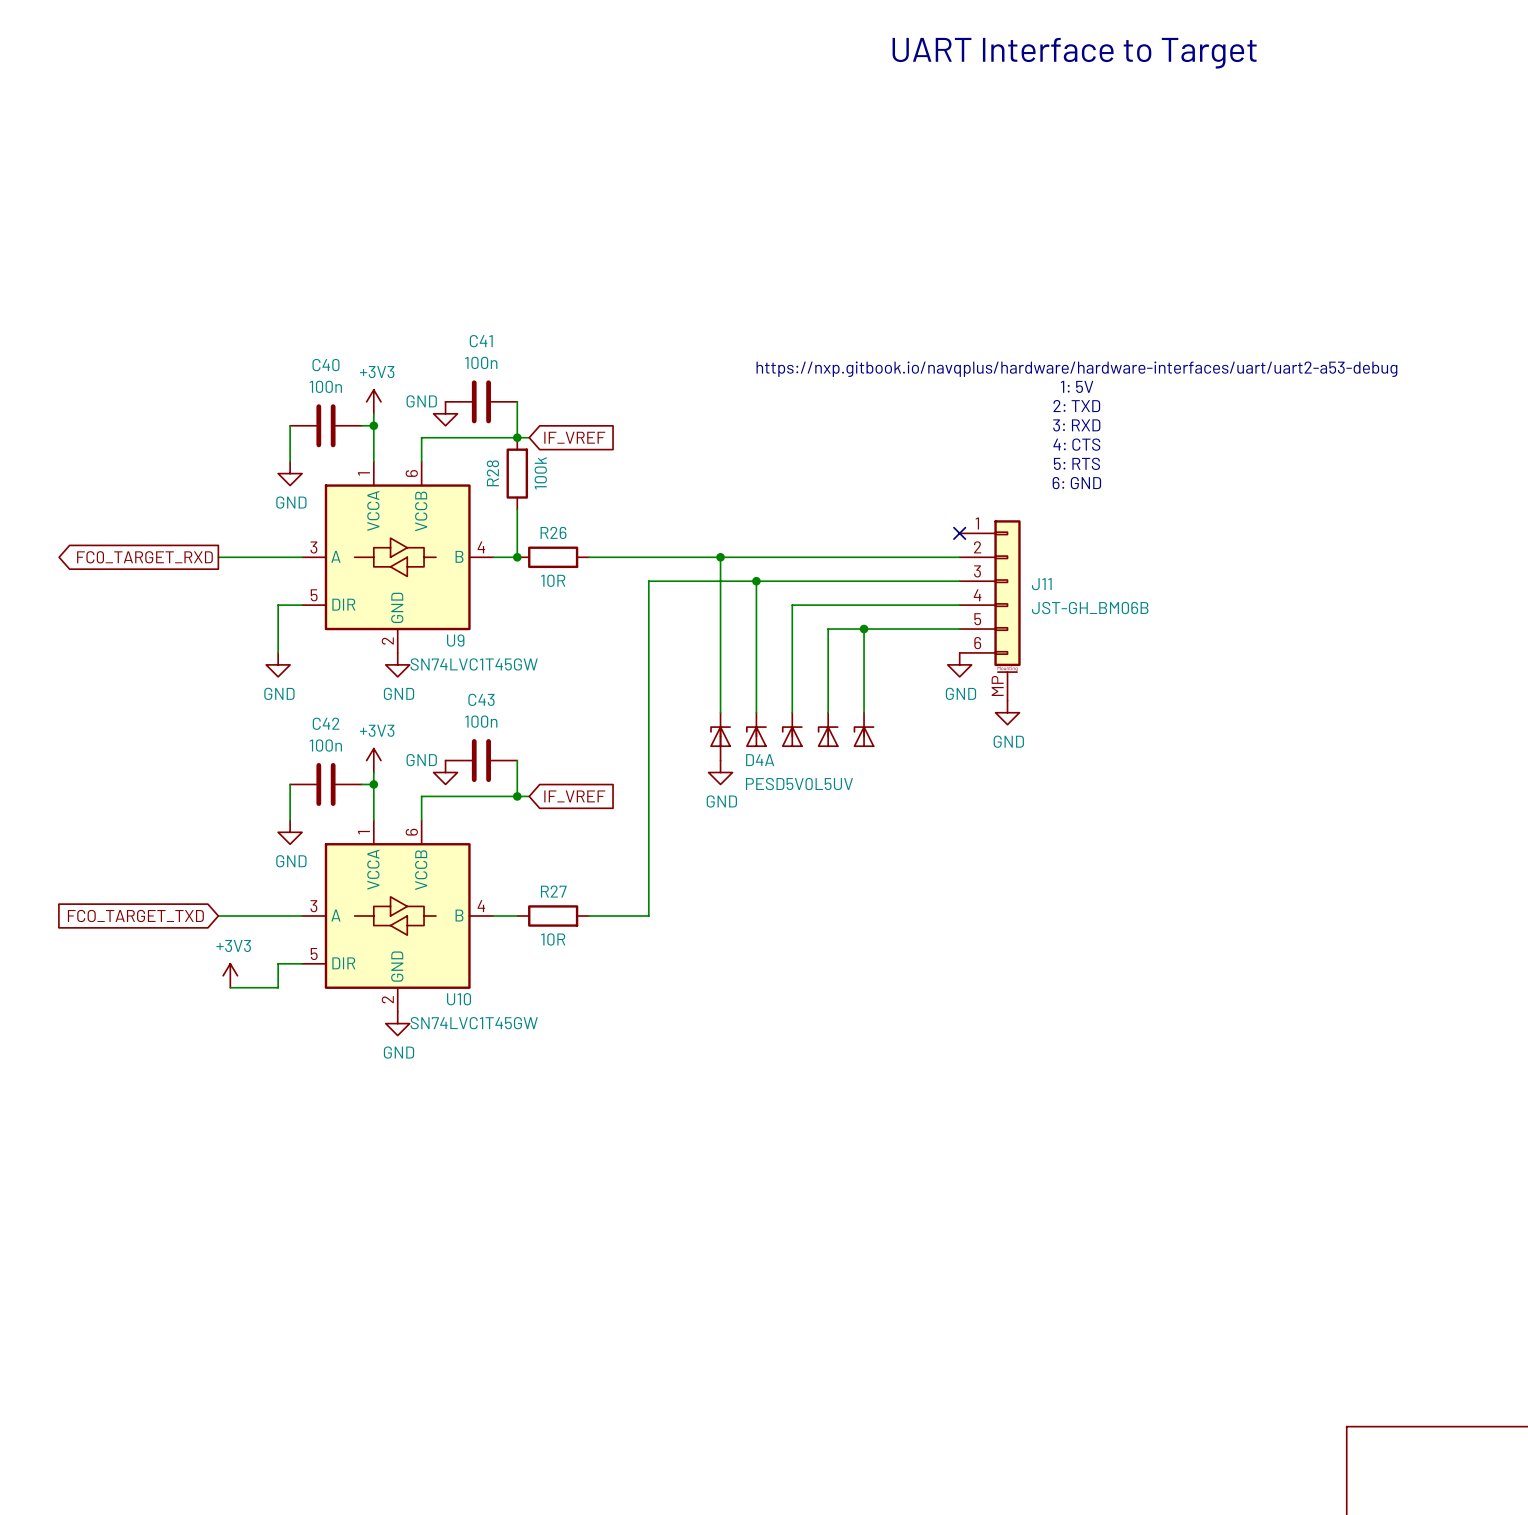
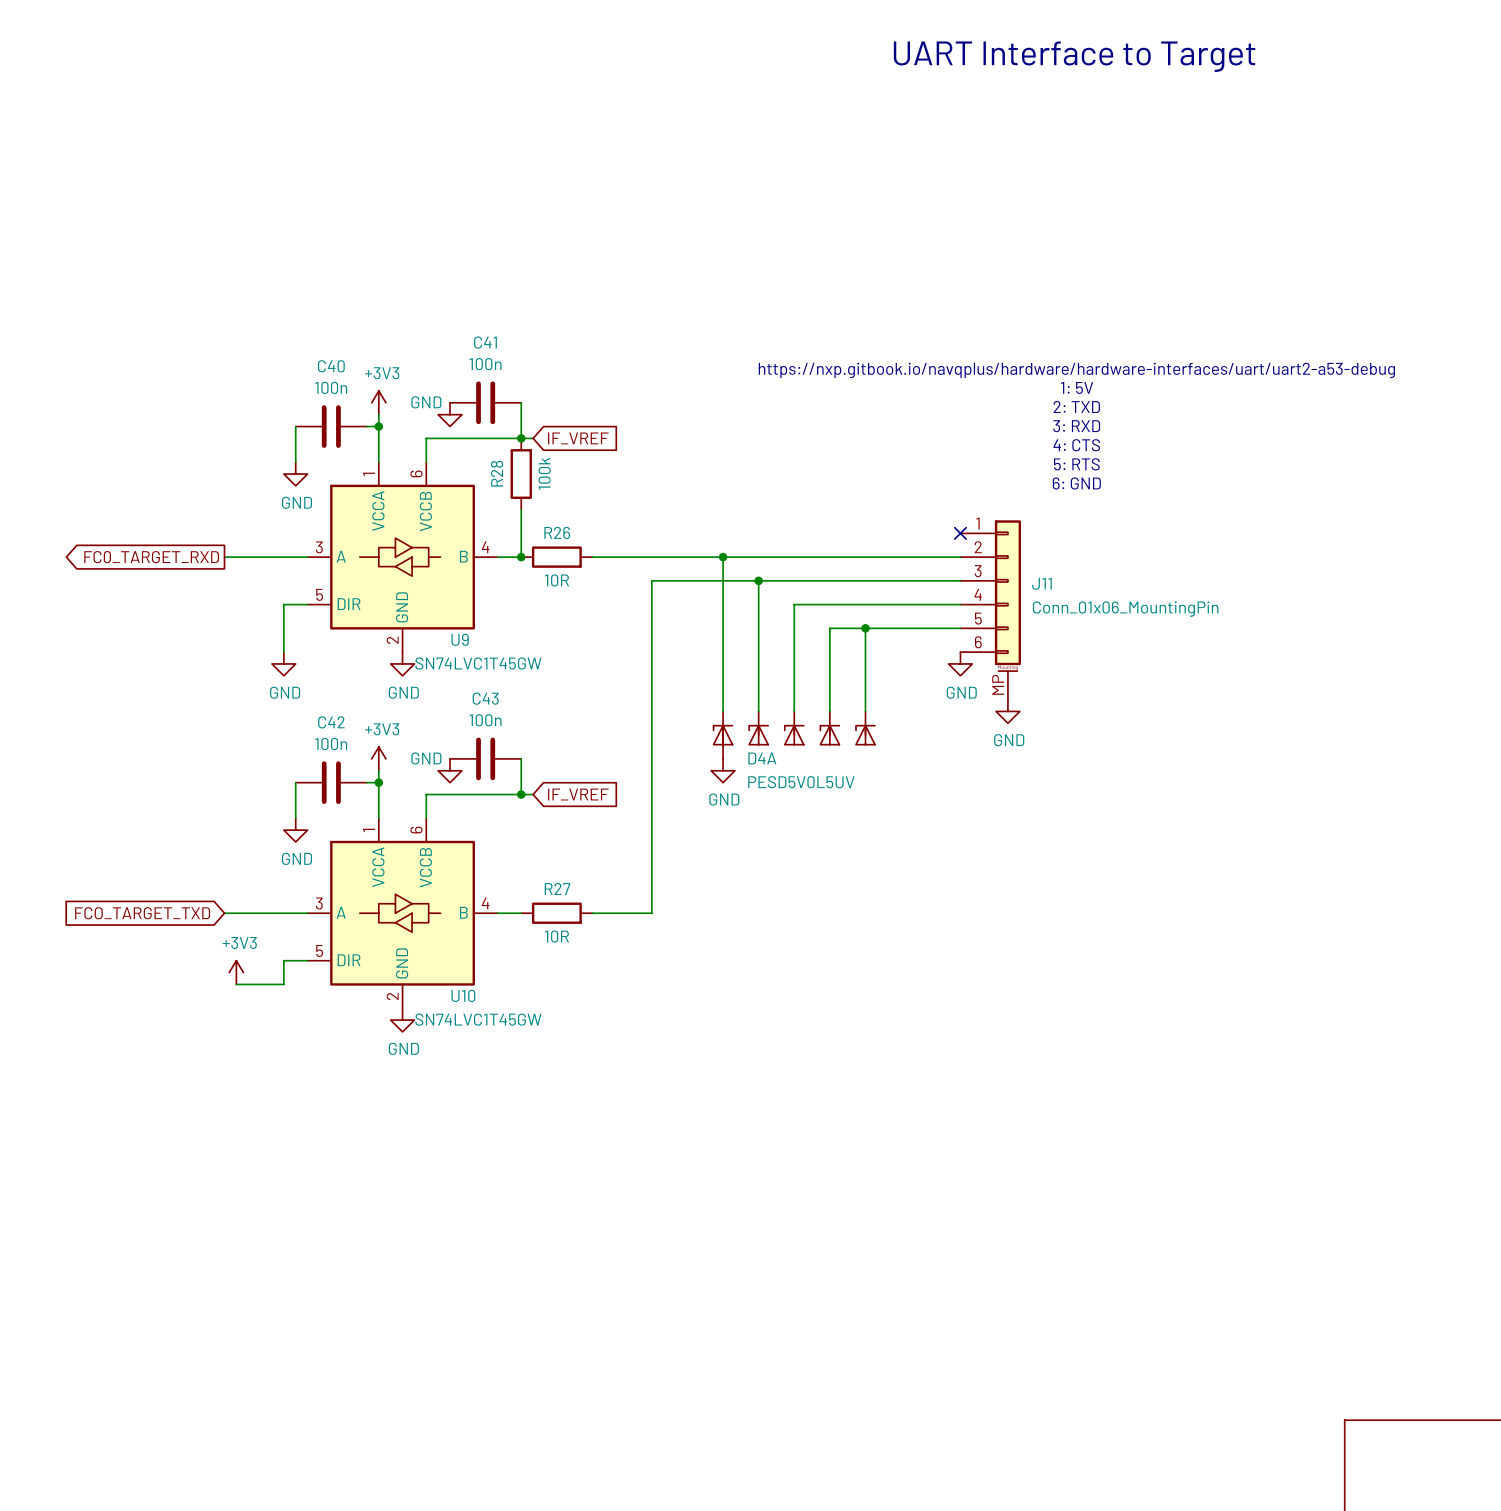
J11 value: JST-GH_BM06B (1090, 608) -> Conn_01x06_MountingPin (1125, 609)

